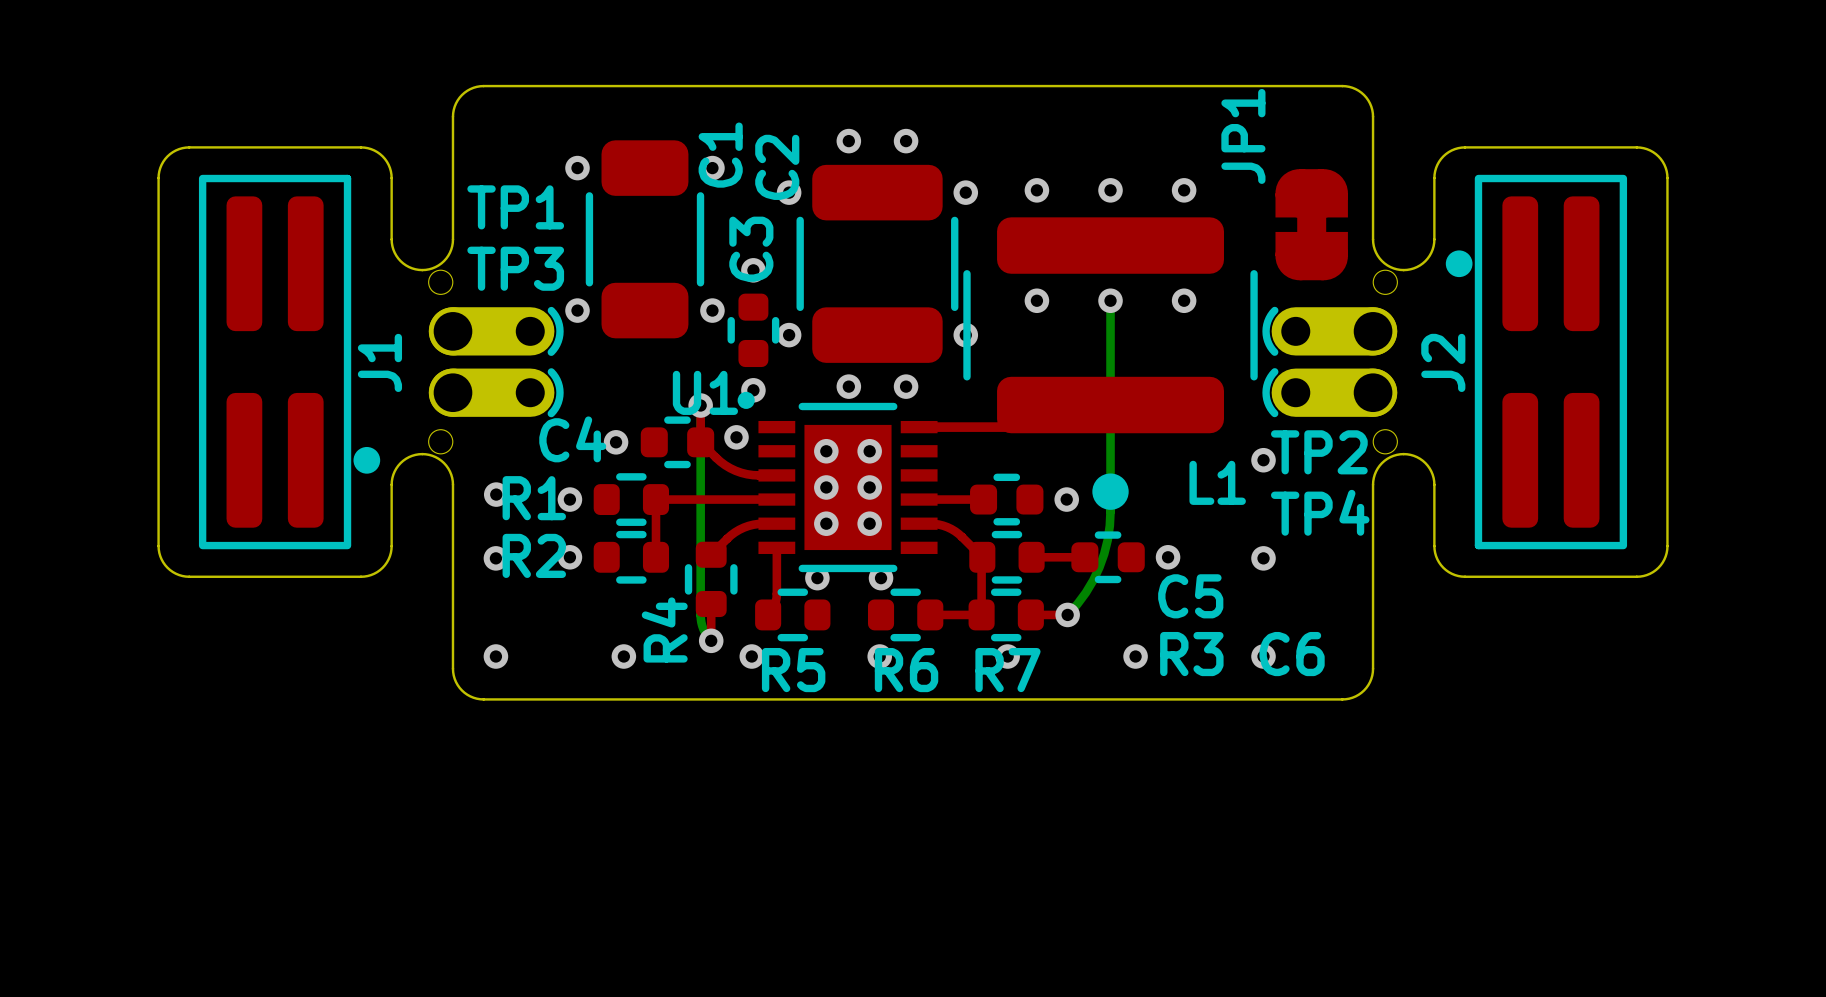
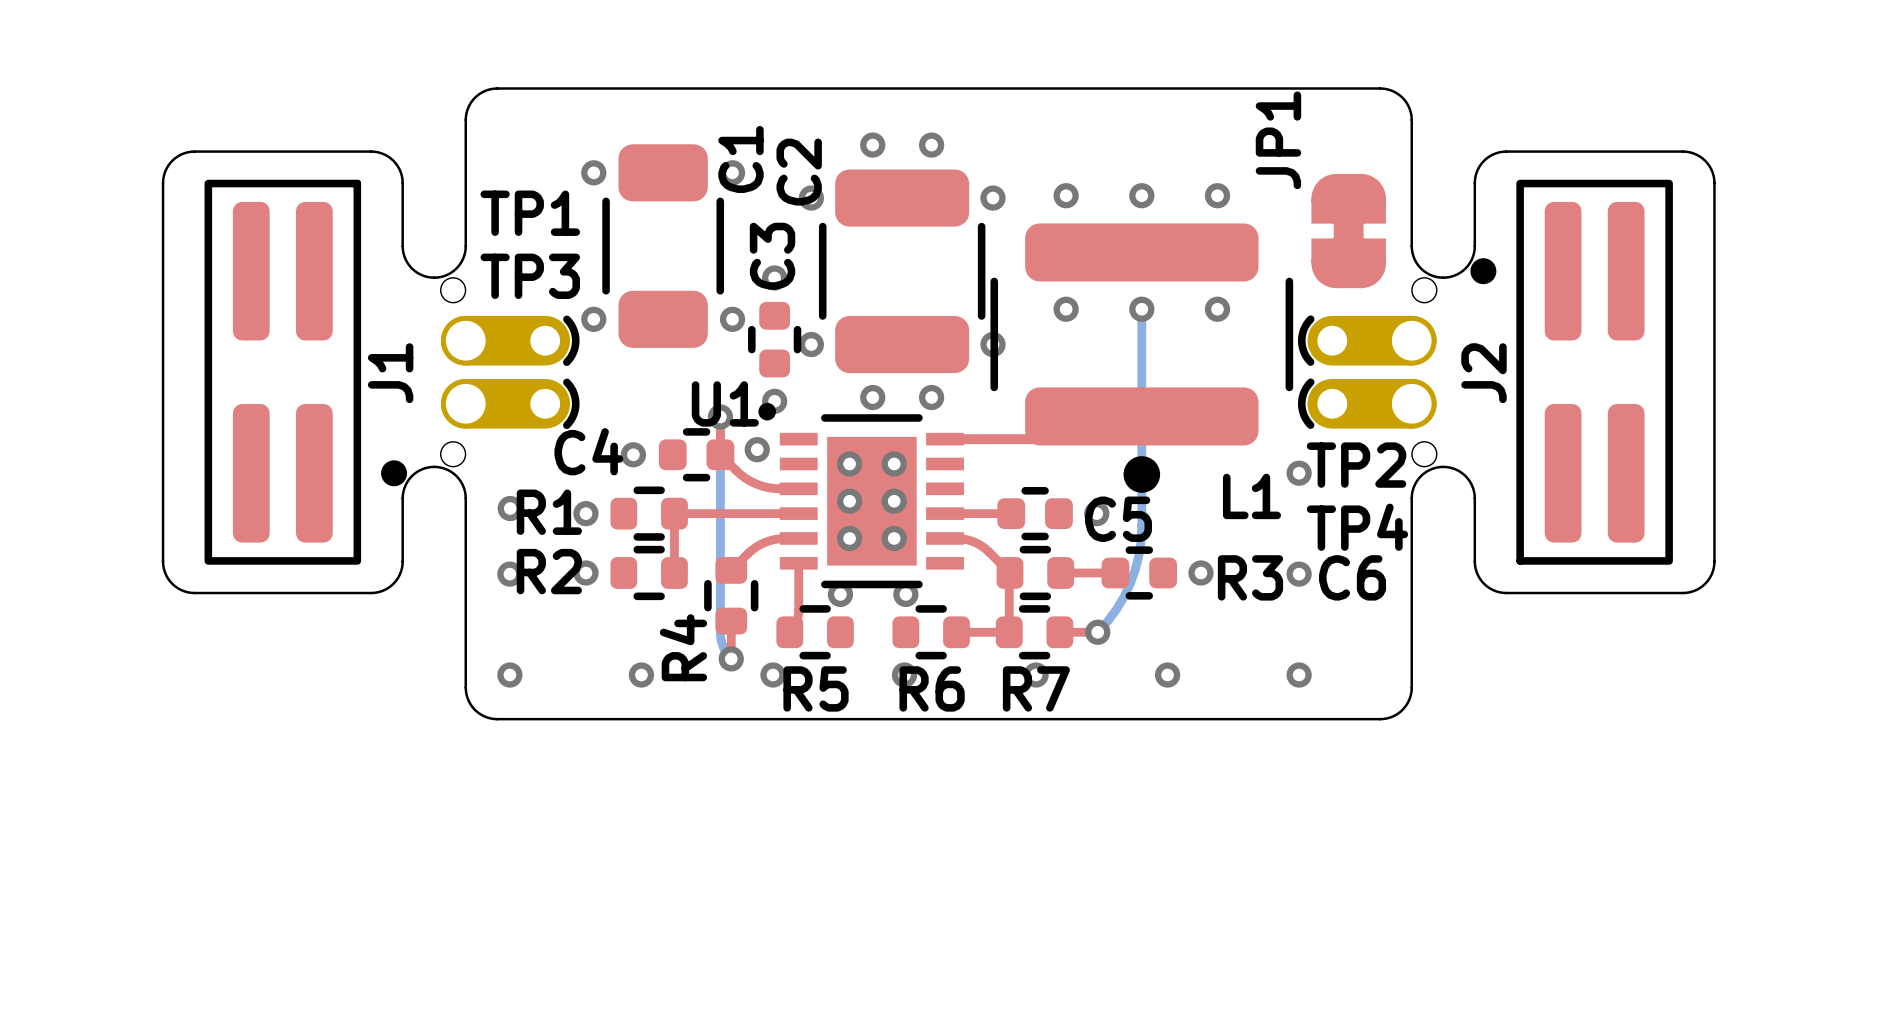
J1 footprint: [198, 174, 381, 550] -> [204, 179, 408, 565]
J2 footprint: [1445, 174, 1628, 550] -> [1470, 179, 1673, 565]
L1 footprint: [963, 217, 1258, 510] -> [990, 223, 1294, 493]
C5 name position: C5 (1190, 596) -> C5 (1118, 519)
R3 name position: R3 (1191, 654) -> R3 (1250, 577)
C6 name position: C6 (1292, 654) -> C6 (1352, 577)

